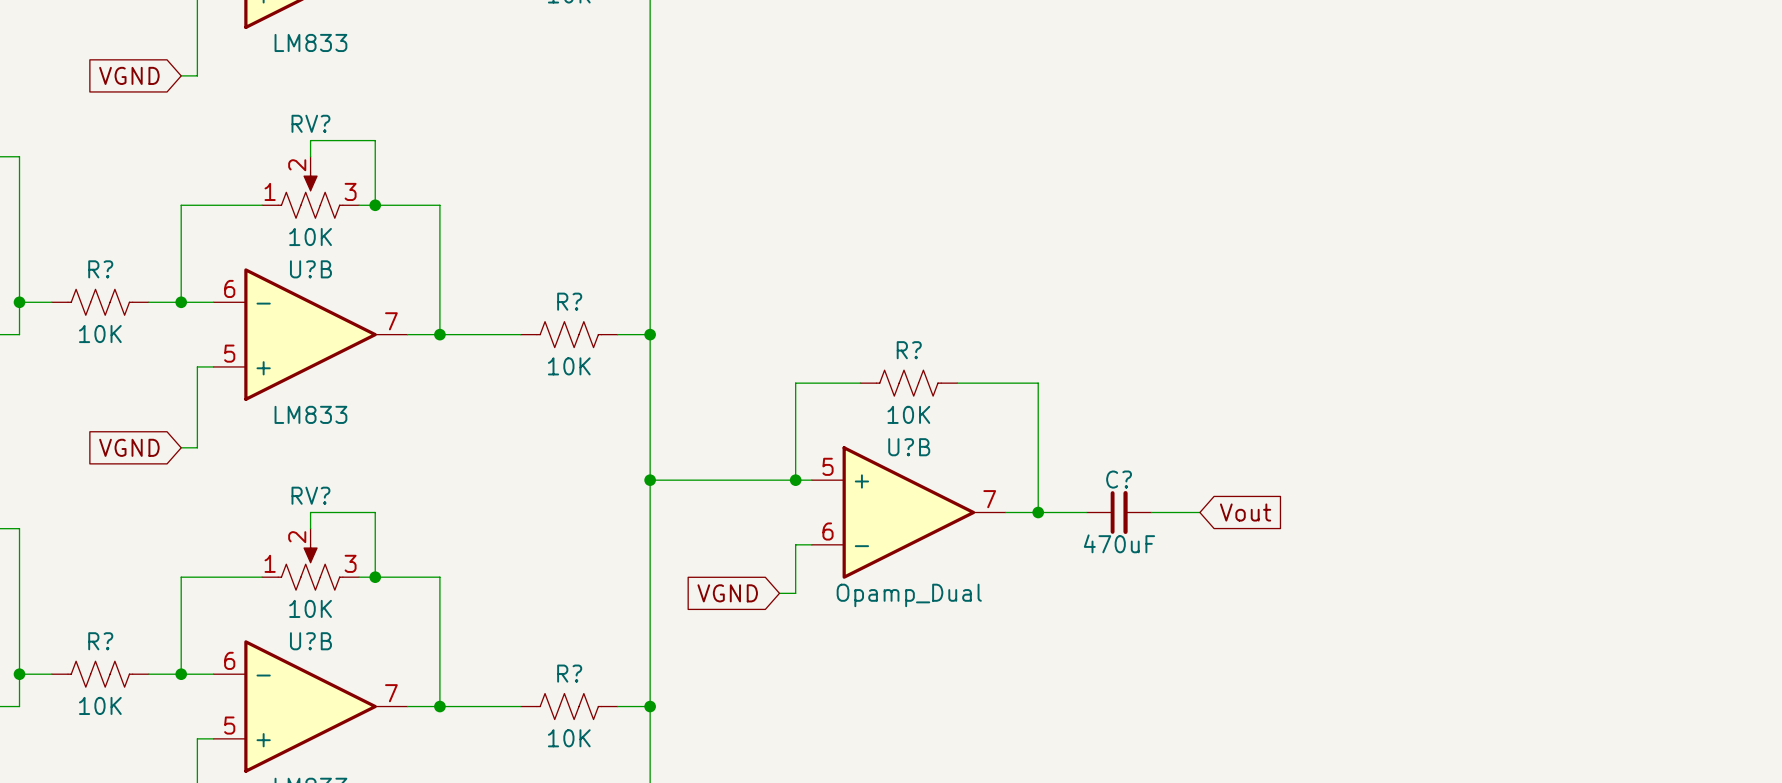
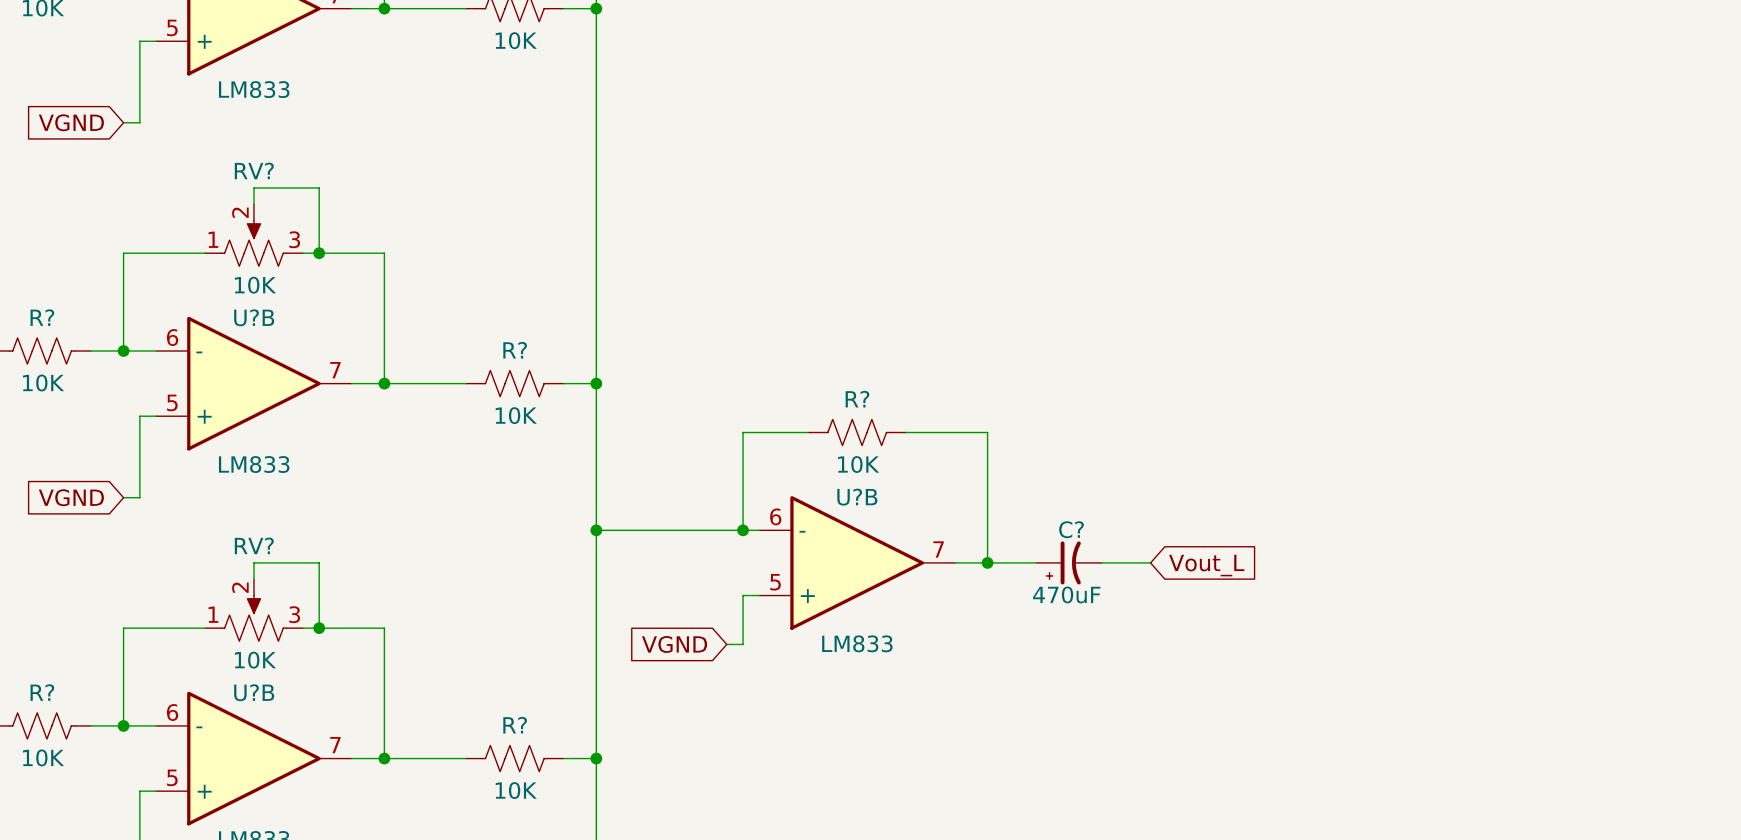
C? symbol: [1086, 490, 1152, 535] -> [1036, 541, 1102, 585]
U?B flip: as is (908, 512) -> up-down (857, 562)
global label: Vout (1245, 512) -> Vout_L (1206, 565)
U?B value: Opamp_Dual (909, 595) -> LM833 (857, 643)

